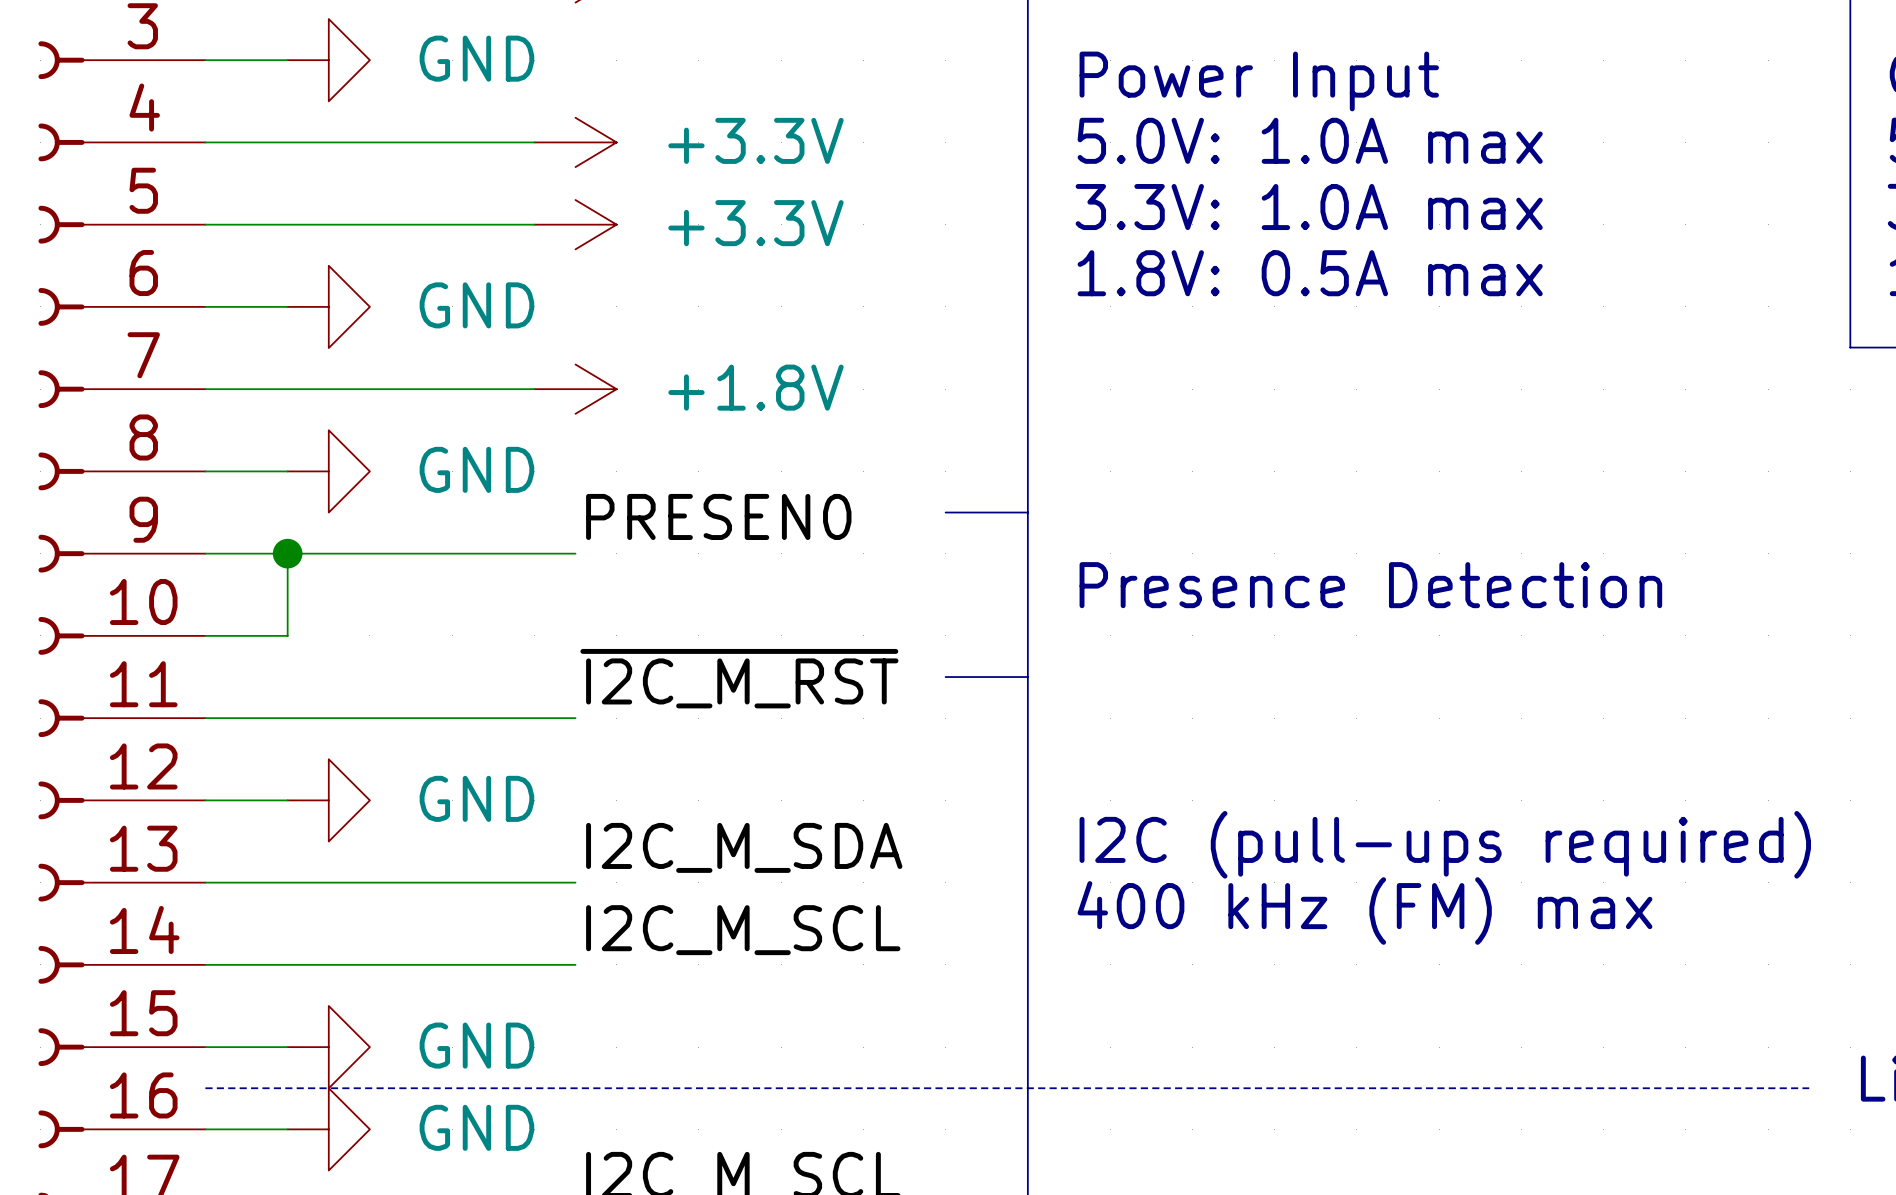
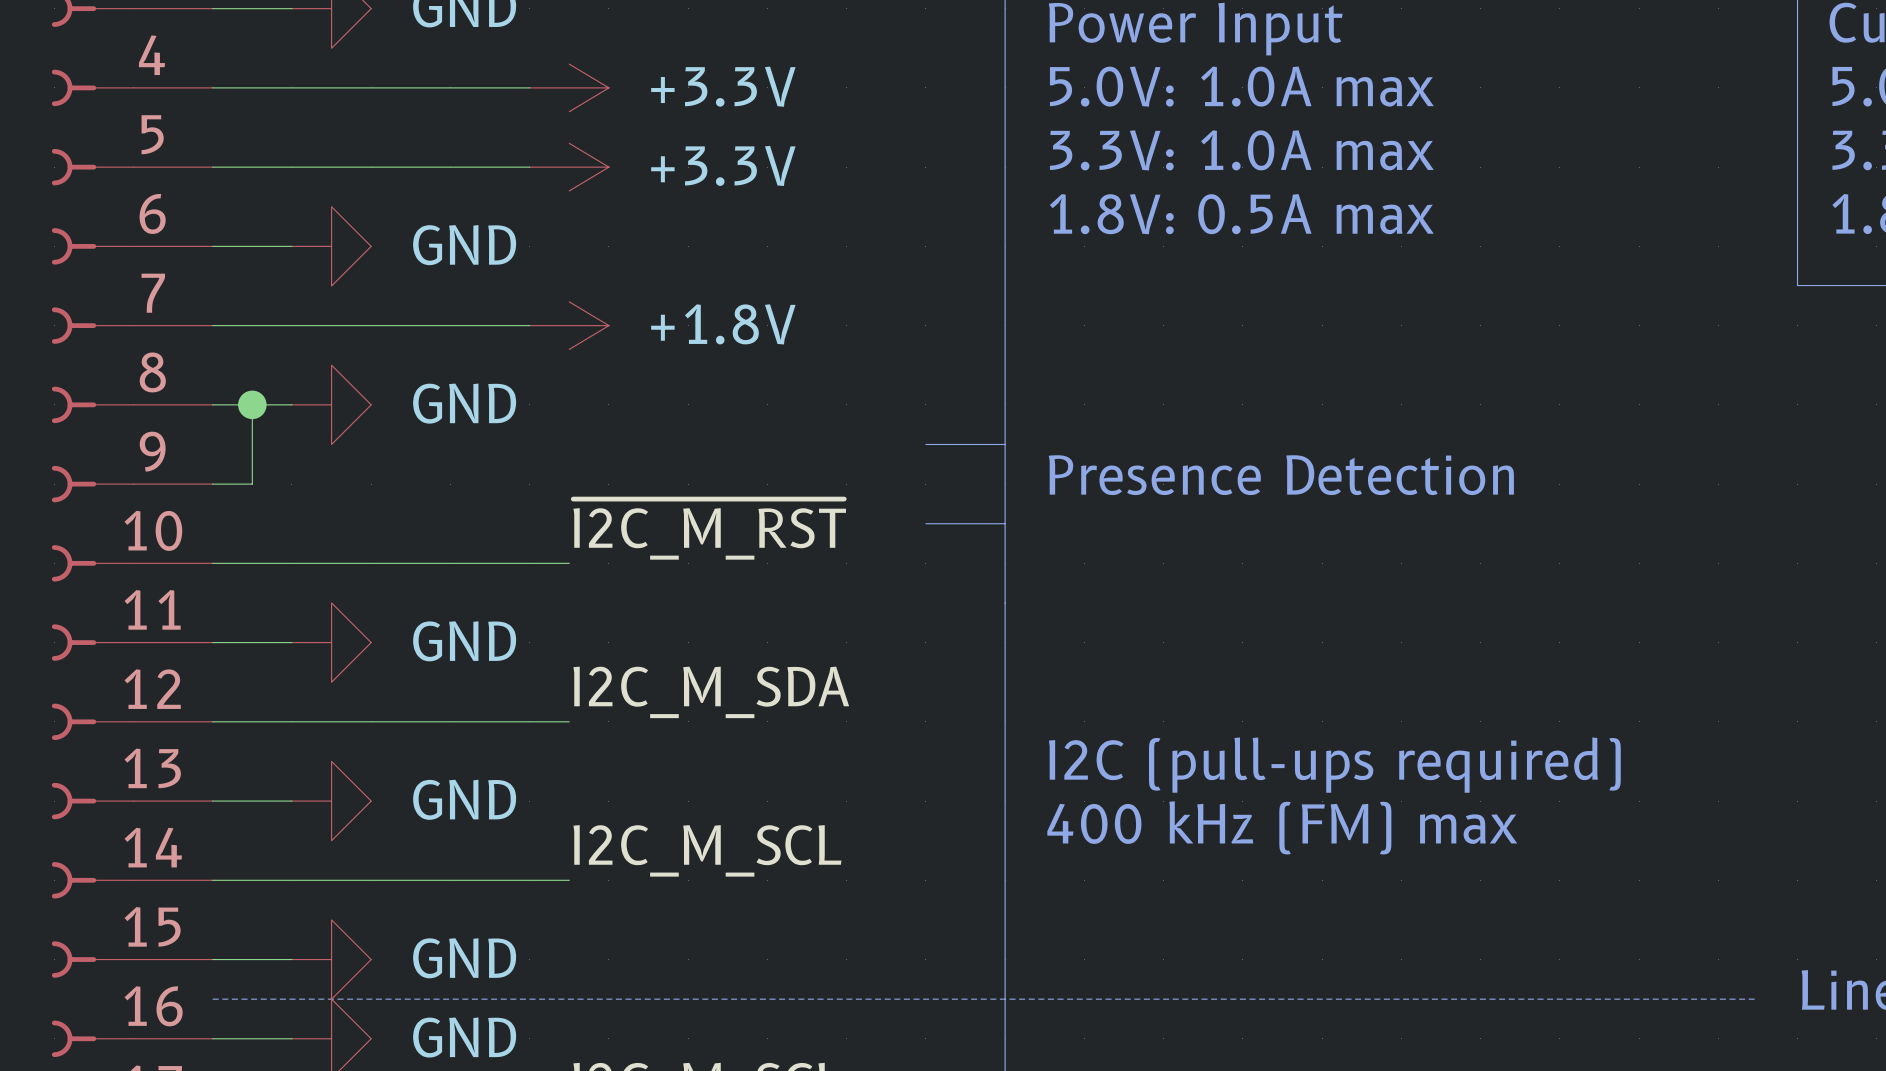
label: PRESEN0 (718, 516) -> none
wire: (246, 553) (575, 553) -> (252, 484) (252, 404)
wire: (287, 553) (287, 635) -> (569, 563) (291, 563)
junction position: (287, 553) -> (252, 404)
text position: Presence Detection (1370, 585) -> Presence Detection (1281, 475)
line: (945, 677) (1027, 677) -> (925, 523) (1005, 523)
label position: ~{I2C_M_RST} (739, 678) -> ~{I2C_M_RST} (709, 529)
wire: (287, 718) (575, 718) -> none
power symbol: none -> GND (331, 642)
power symbol: GND (328, 800) -> none
label position: I2C_M_SDA (744, 847) -> I2C_M_SDA (711, 692)
wire: (287, 882) (575, 882) -> (291, 721) (569, 721)
power symbol: none -> GND (331, 801)

